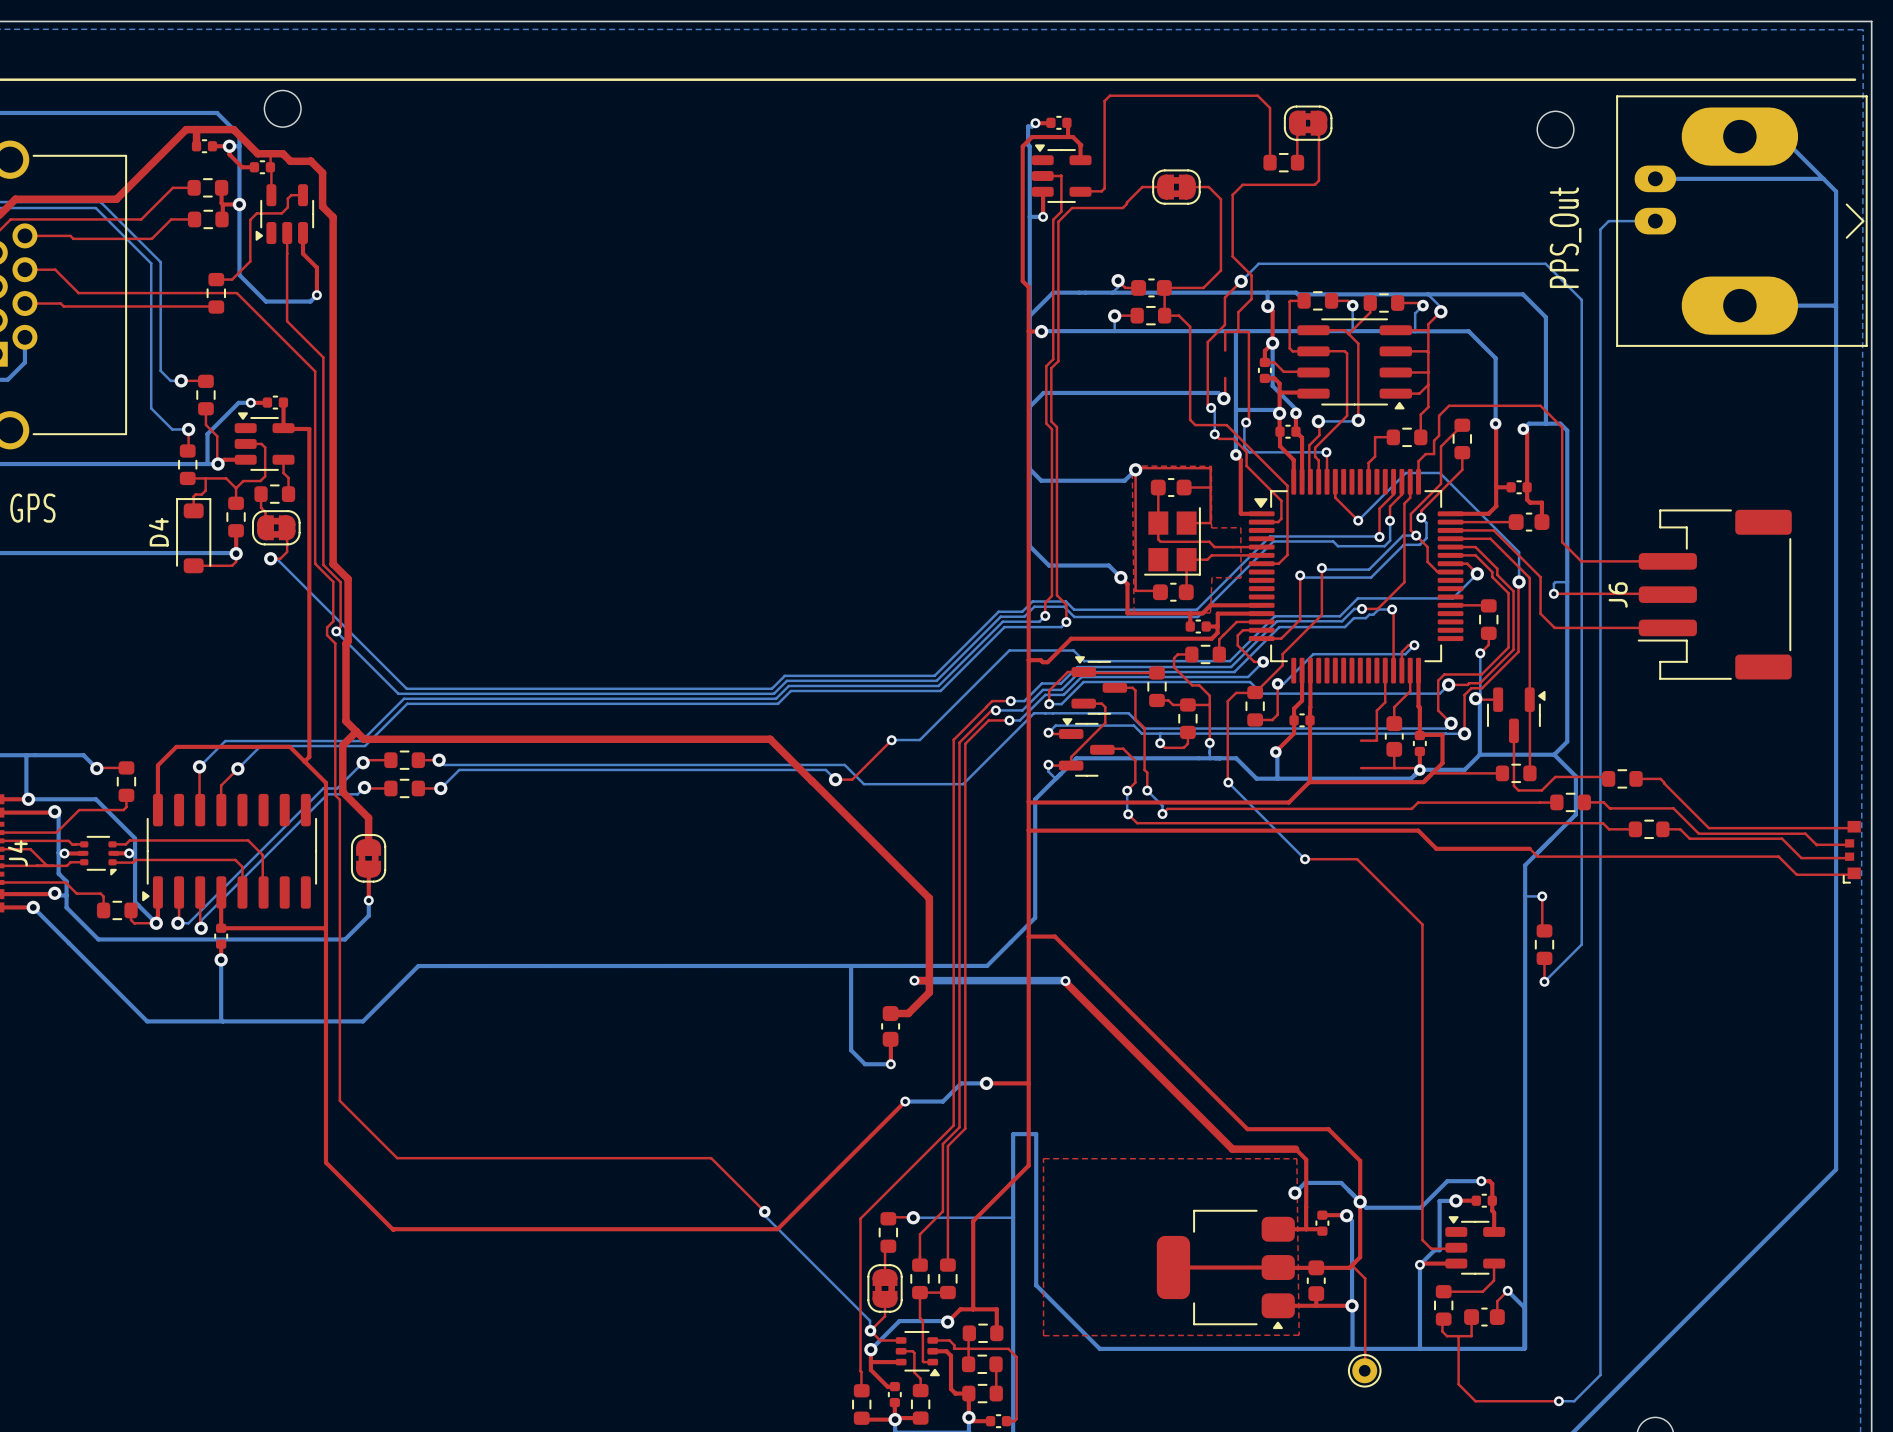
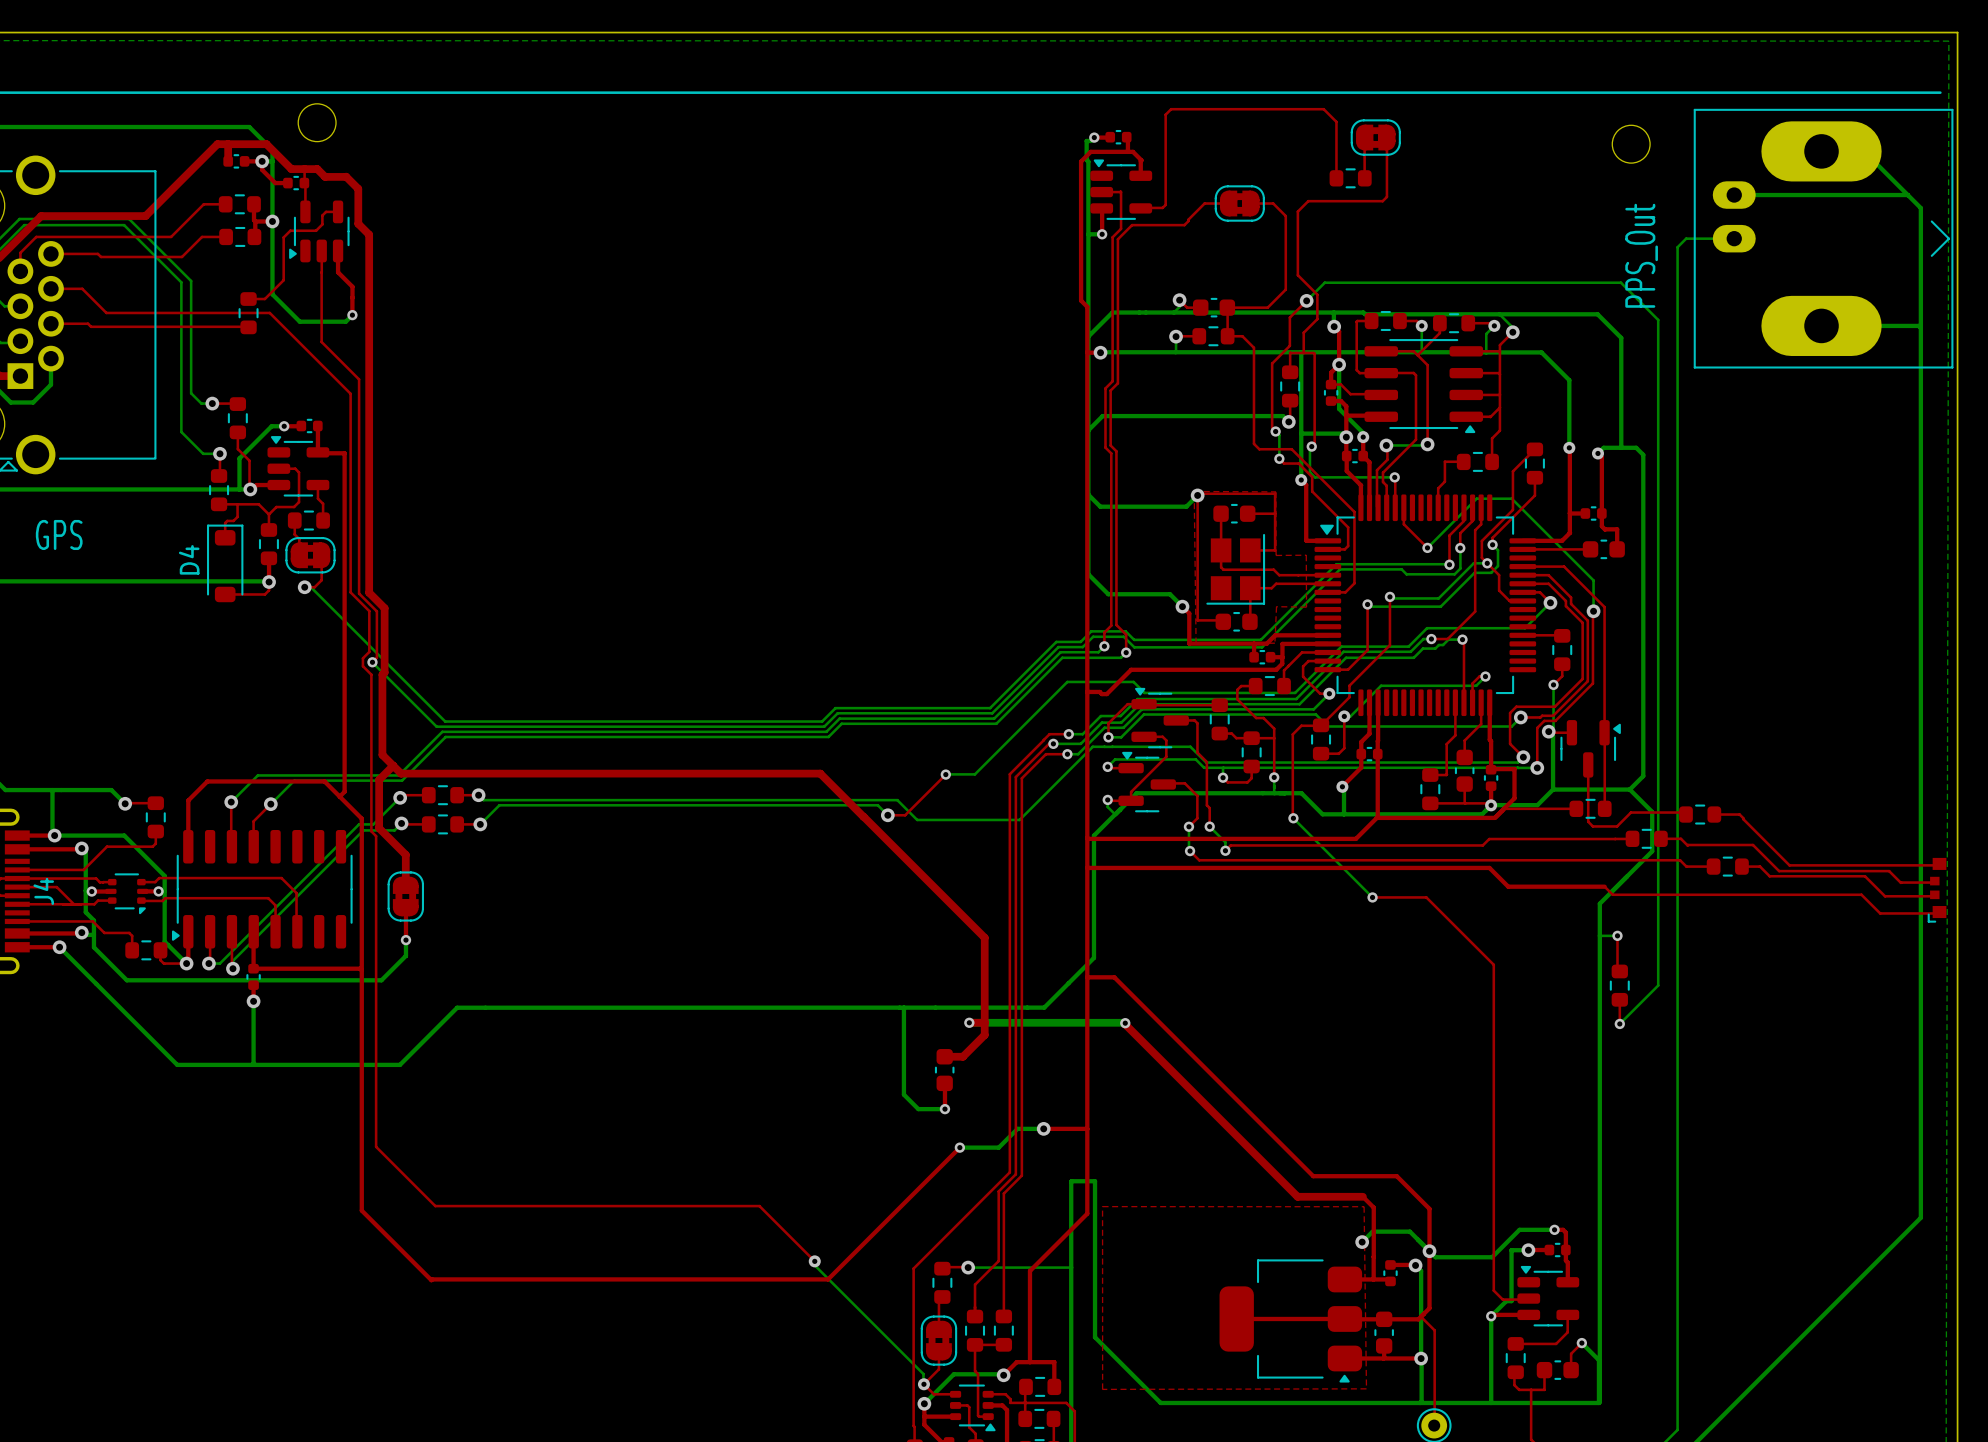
part: none -> (1290, 386)
top track: (1418, 481) (1418, 461) (1425, 454) (1434, 454) (1434, 440) (1439, 435) (1439, 415) (1449, 405) (1540, 405) (1562, 427) (1562, 542) (1581, 561) (1667, 561) -> none
top track: (1450, 530) (1493, 530) (1540, 577) (1540, 613) (1554, 627) (1667, 627) -> none
bottom track: (1567, 582) (1555, 582) (1553, 593) -> none
top track: (1553, 593) (1667, 594) -> none
via: (1553, 593) -> none
J6: (1714, 594) -> none
part: none -> (1430, 789)

